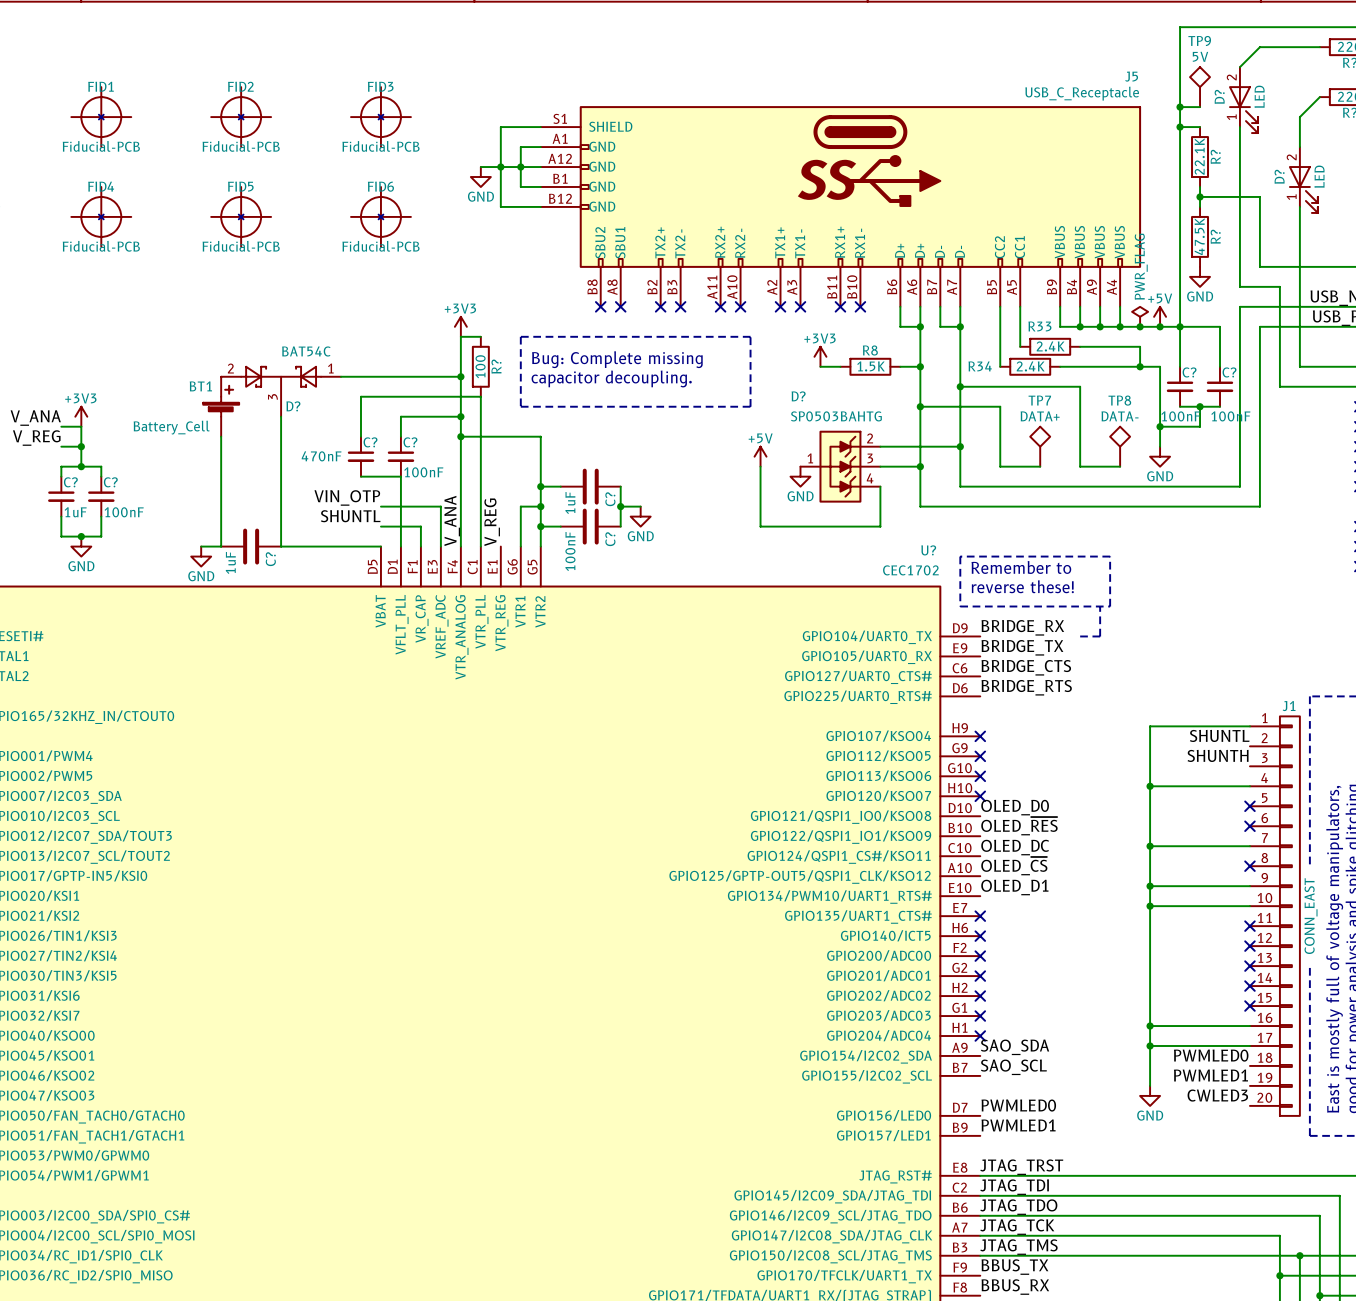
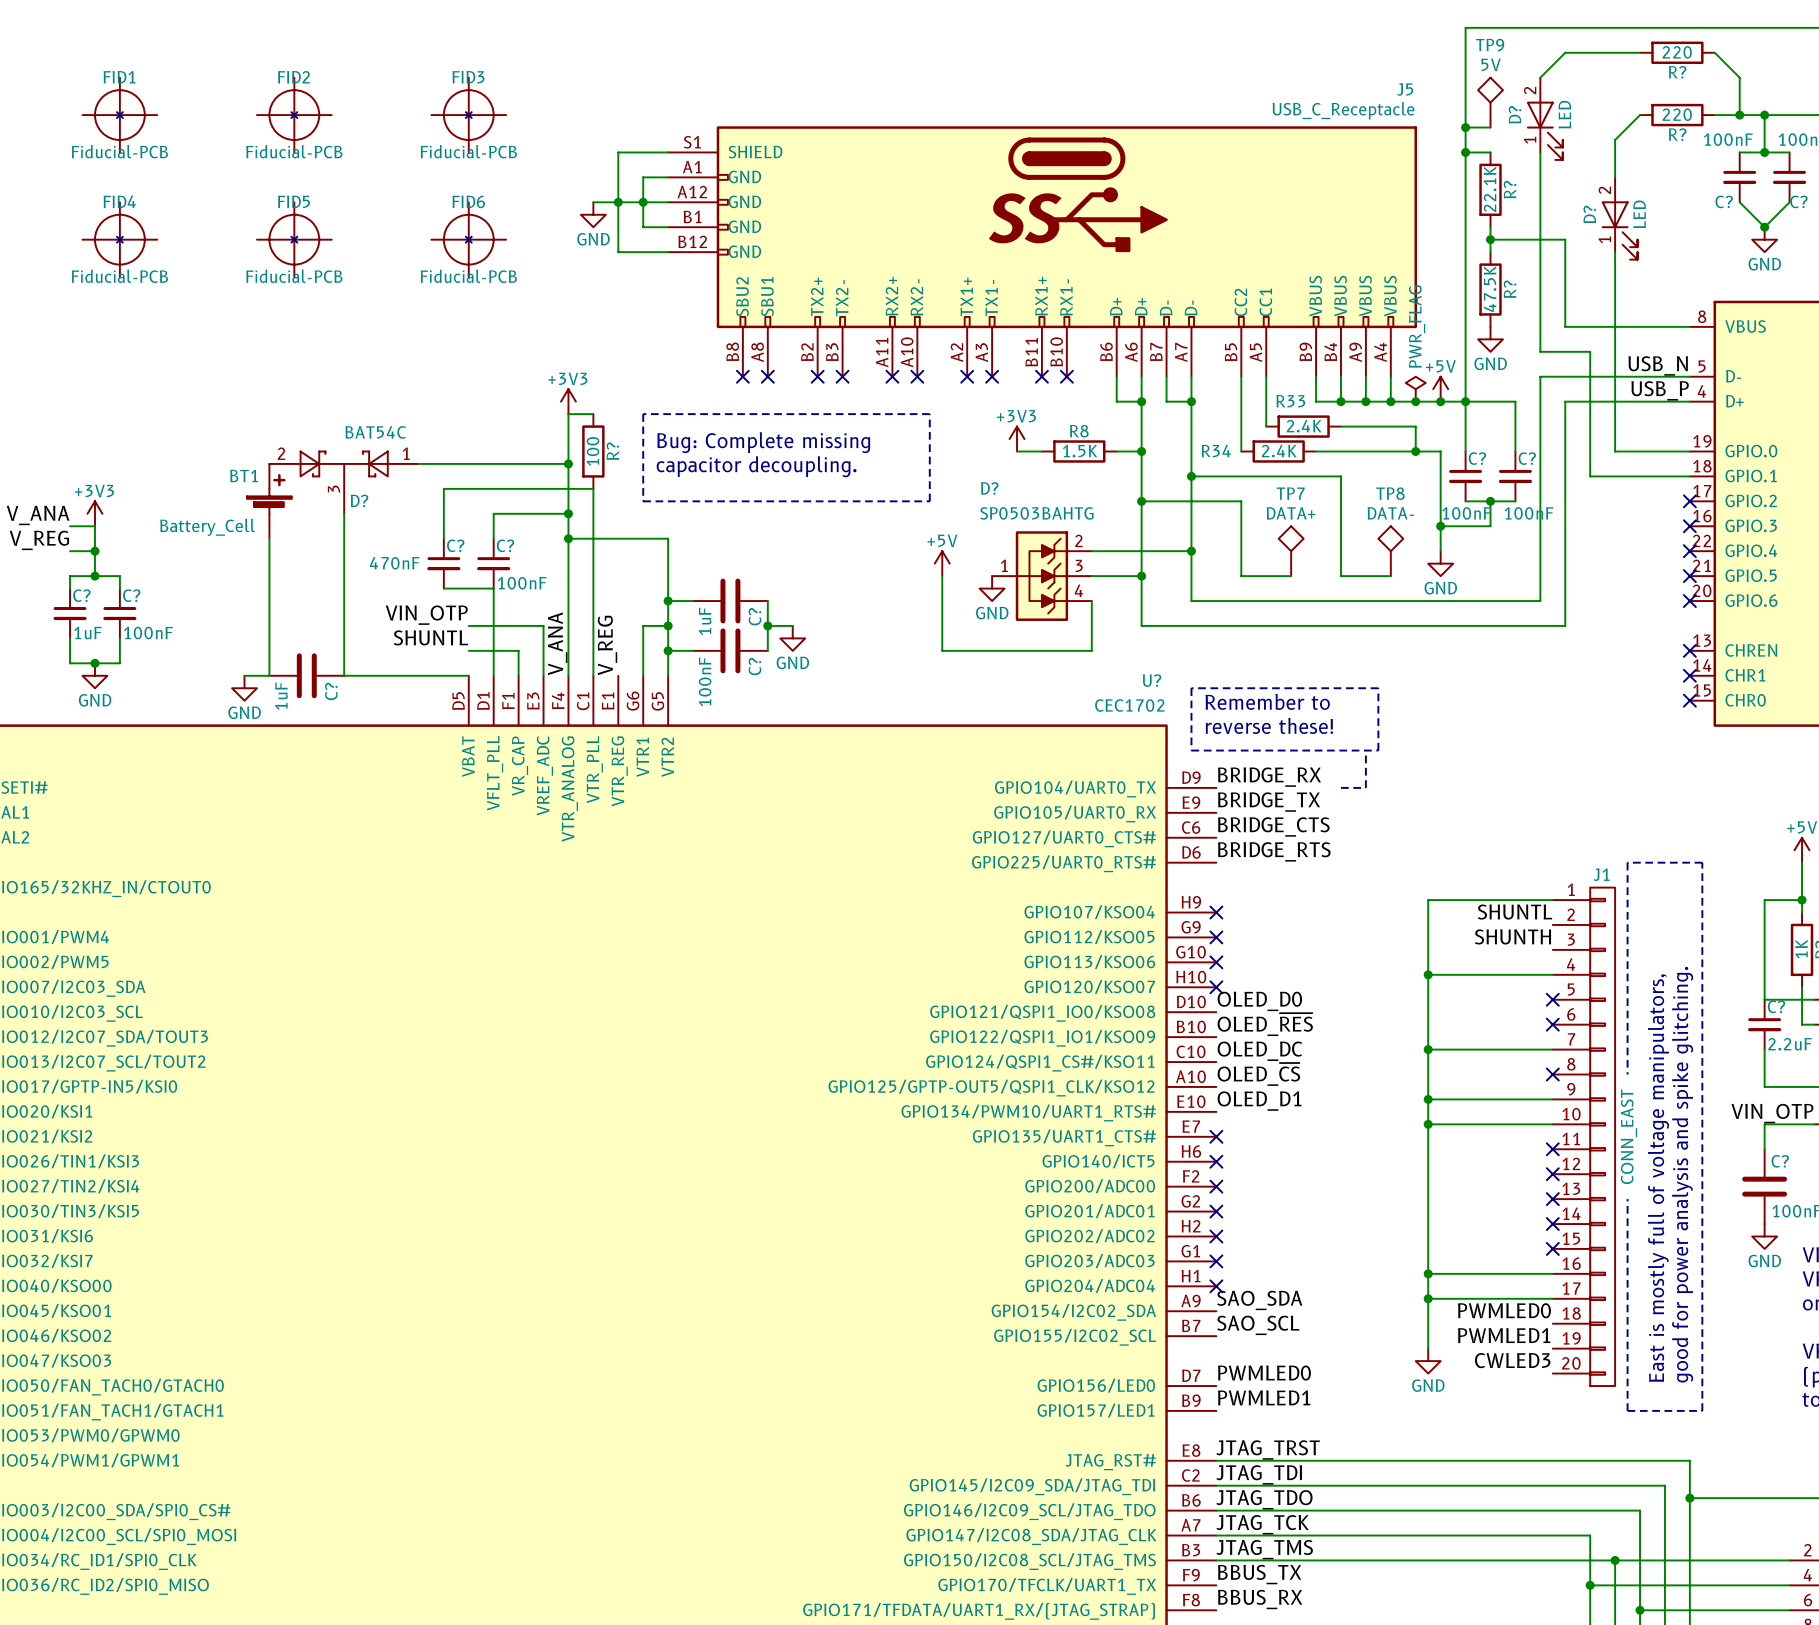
FID1 position: (101, 117) -> (119, 115)
FID2 position: (241, 117) -> (294, 115)
FID3 position: (380, 117) -> (468, 115)
FID4 position: (101, 216) -> (119, 239)
FID5 position: (241, 216) -> (294, 239)
FID6 position: (380, 216) -> (468, 239)

